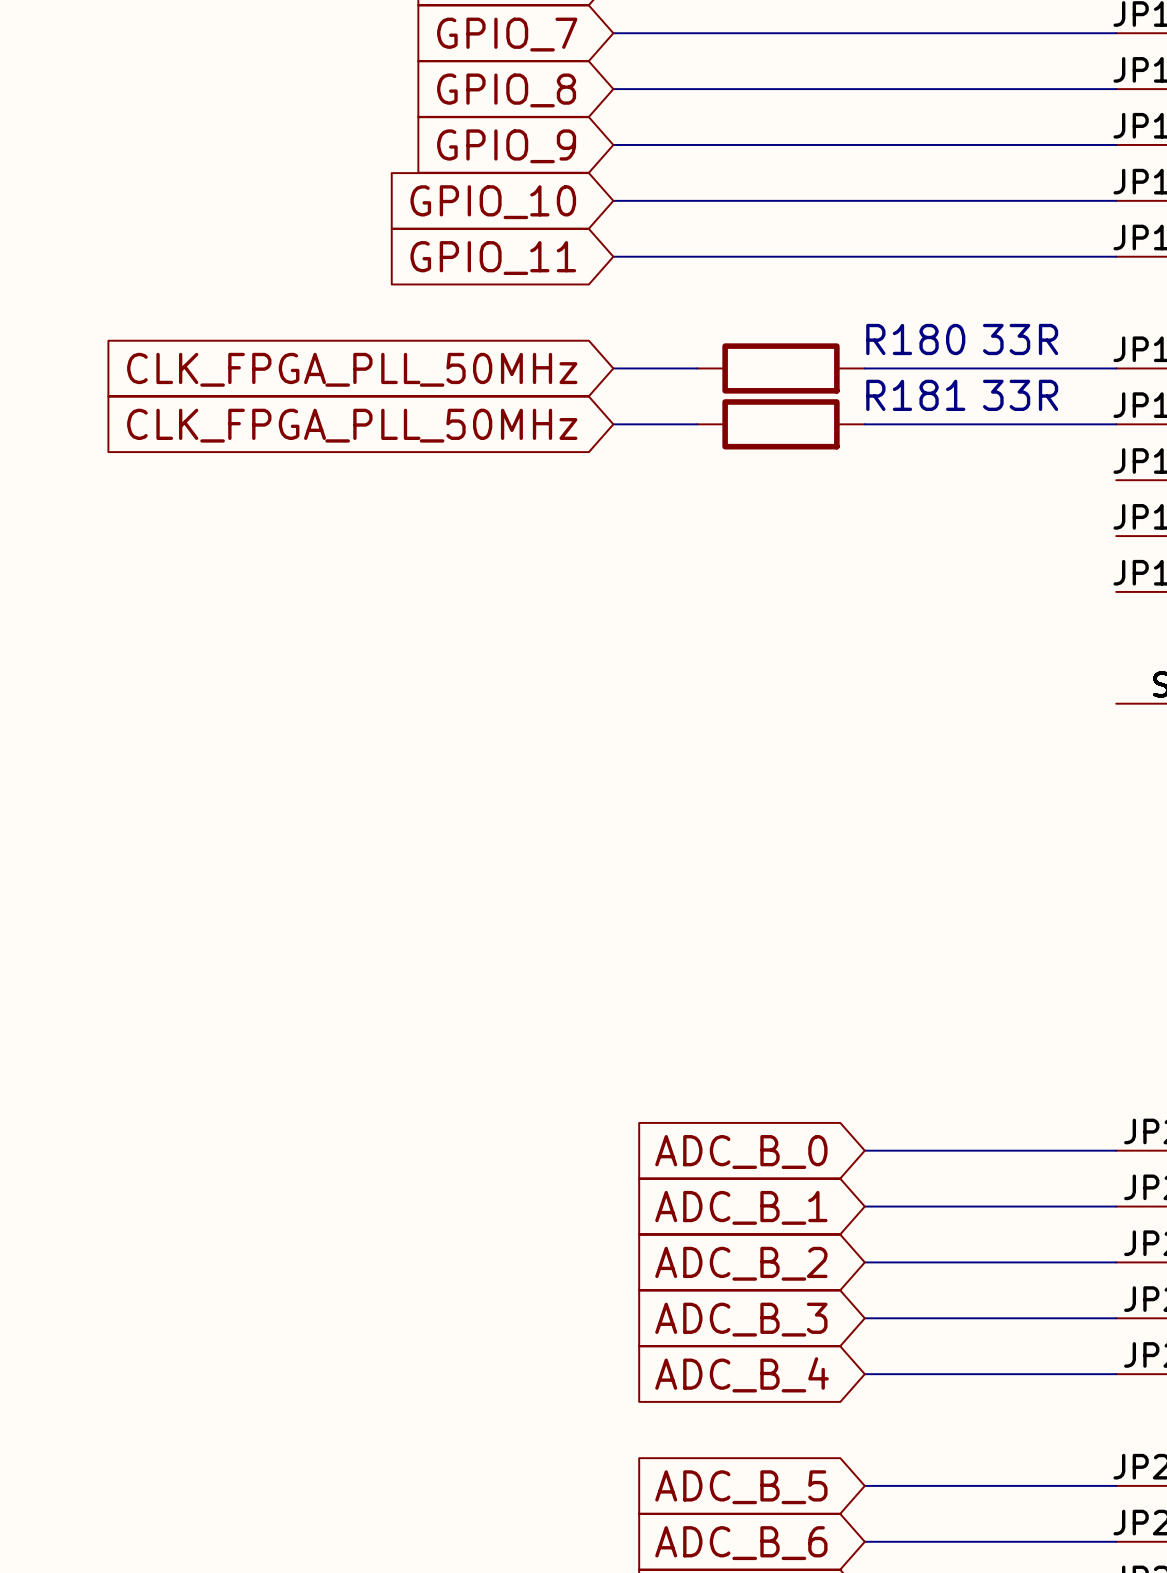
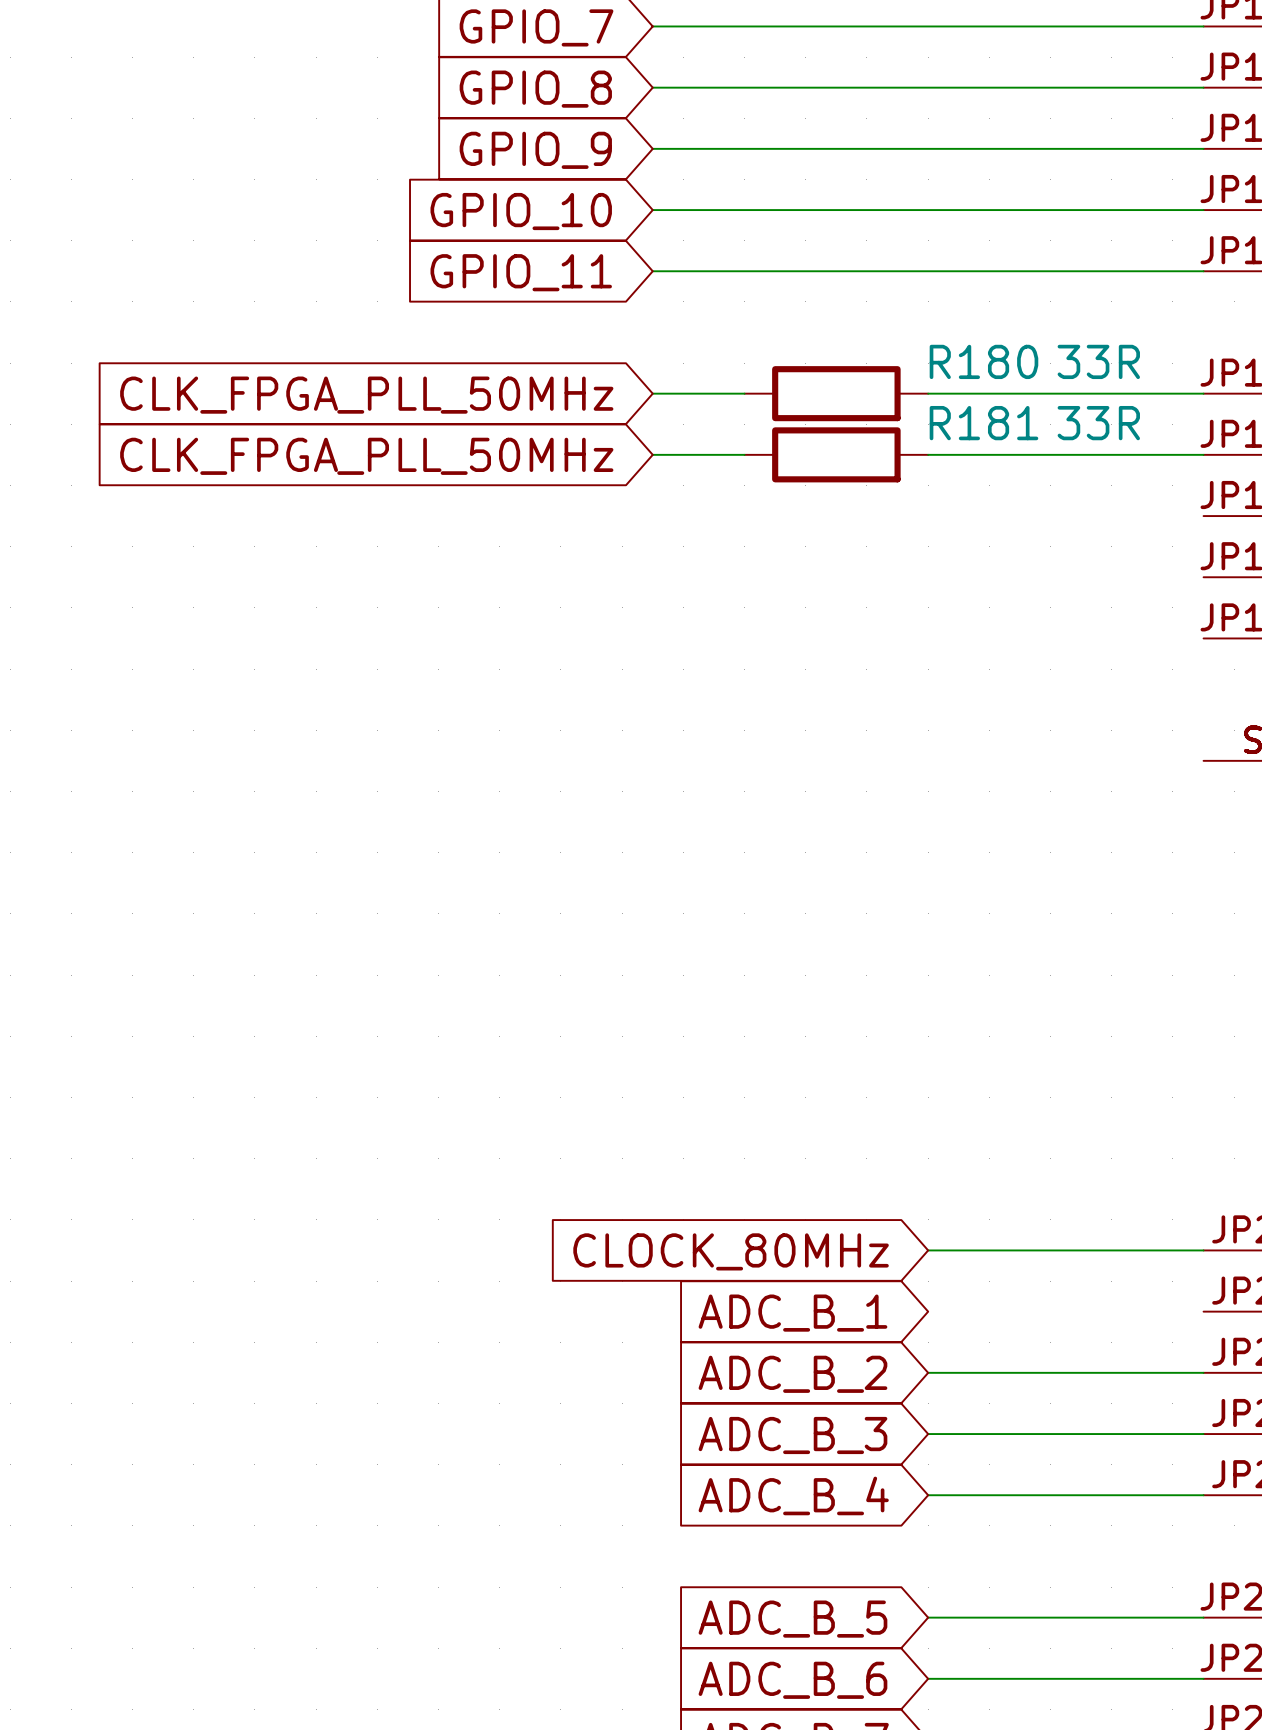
global label: ADC_B_0 (741, 1152) -> CLOCK_80MHz (731, 1251)
wire: (864, 1206) (1116, 1206) -> none

